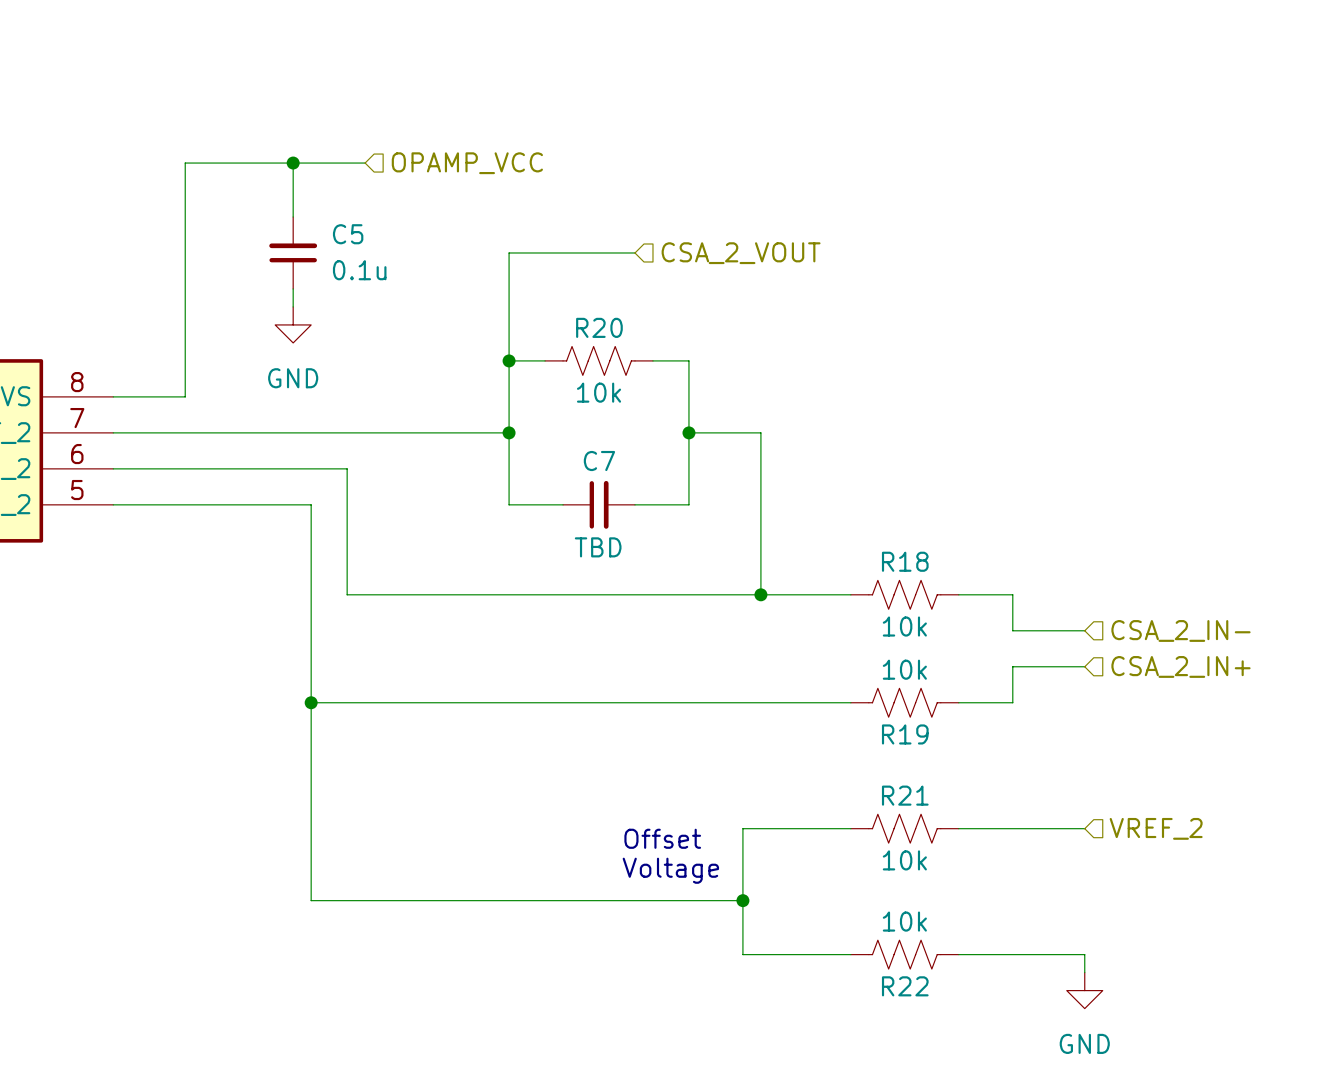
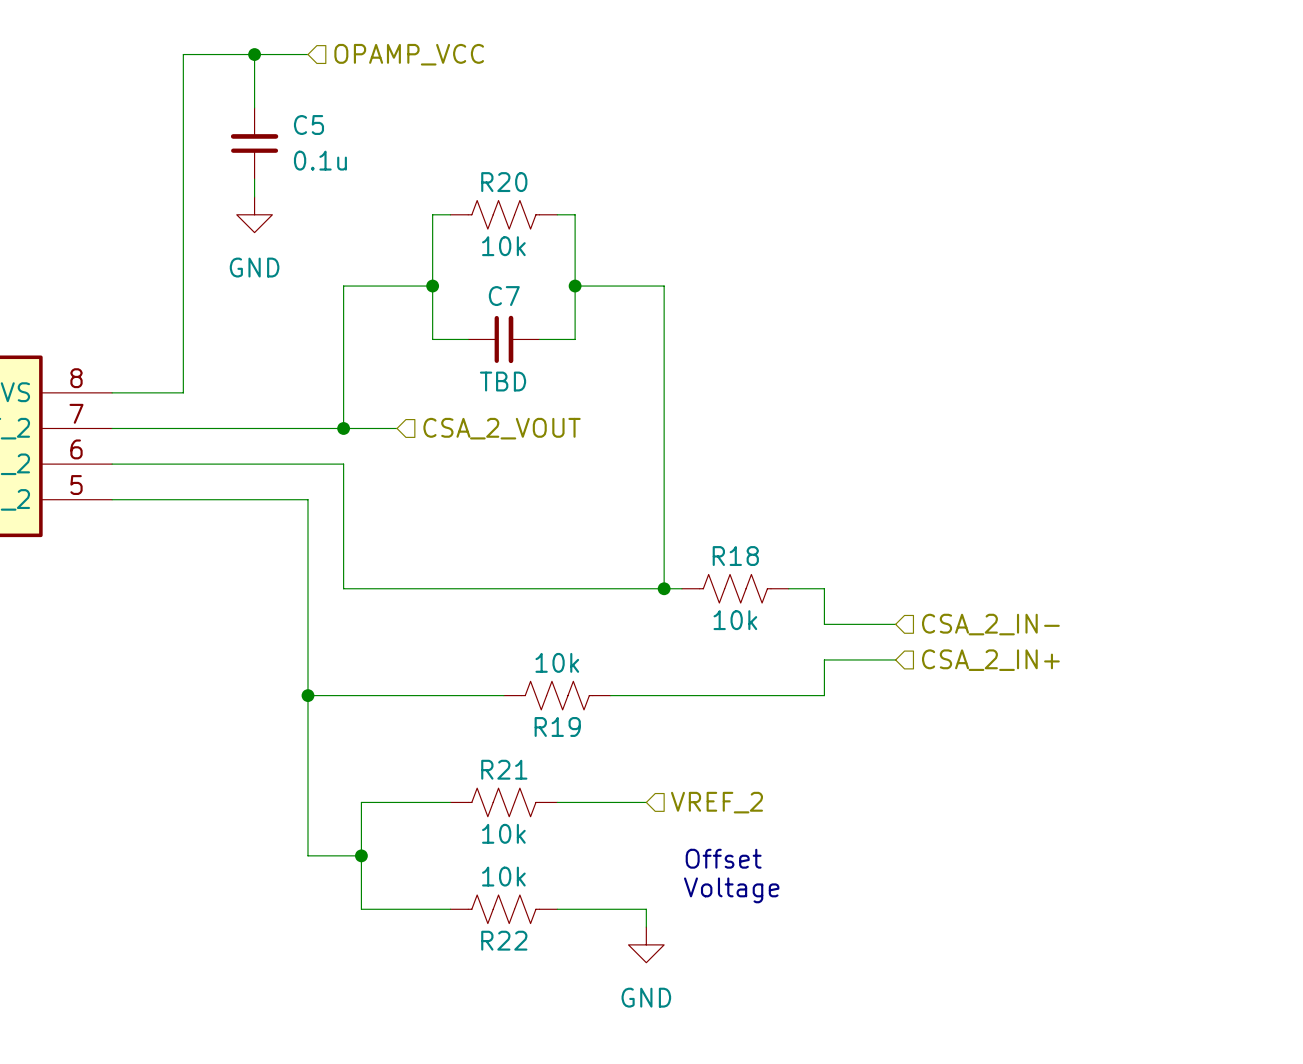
junction: none -> (254, 54)
wire: (185, 163) (365, 163) -> (183, 161) (183, 54) (307, 54)
wire: (293, 163) (293, 217) -> (254, 54) (254, 107)
junction: (293, 163) -> none
hierarchical label position: OPAMP_VCC (467, 163) -> OPAMP_VCC (409, 54)
wire: none -> (450, 214) (432, 214) (432, 339) (468, 339)
wire: none -> (557, 214) (575, 214) (575, 339) (539, 339)
C5 position: (293, 252) -> (254, 143)
wire: (634, 252) (509, 252) (509, 504) (563, 504) -> none
hierarchical label position: CSA_2_VOUT (741, 253) -> CSA_2_VOUT (502, 428)
wire: (293, 288) (293, 306) -> (254, 179) (254, 196)
wire: none -> (432, 286) (343, 286) (343, 428)
junction: none -> (432, 286)
wire: none -> (575, 286) (664, 286) (664, 588)
junction: none -> (575, 286)
power symbol position: GND (293, 324) -> GND (254, 214)
wire: (509, 360) (545, 360) -> none
junction: (509, 360) -> none
R20 position: (599, 360) -> (503, 214)
wire: (652, 360) (688, 360) (688, 504) (634, 504) -> none
junction: none -> (343, 428)
wire: (401, 432) (509, 432) -> none
junction: (509, 432) -> none
wire: (688, 432) (760, 432) (760, 594) -> none
junction: (688, 432) -> none
C7 position: (599, 504) -> (503, 339)
junction: none -> (664, 588)
wire: (688, 594) (796, 594) -> none
junction: (760, 594) -> none
wire: (832, 594) (850, 594) -> (824, 588) (824, 624) (895, 624)
R18 position: (904, 594) -> (735, 588)
wire: (958, 594) (1012, 594) (1012, 630) (1084, 630) -> none
hierarchical label position: CSA_2_IN- (1180, 630) -> CSA_2_IN- (990, 624)
wire: (1084, 666) (1012, 666) (1012, 702) (958, 702) -> none
hierarchical label position: CSA_2_IN+ (1180, 666) -> CSA_2_IN+ (990, 660)
wire: (509, 702) (617, 702) -> none
wire: (832, 702) (850, 702) -> (824, 695) (824, 659) (895, 659)
R19 position: (904, 702) -> (557, 695)
wire: none -> (450, 802) (361, 802) (361, 909) (450, 909)
wire: none -> (557, 802) (646, 802)
hierarchical label: none -> VREF_2 (716, 802)
wire: (850, 828) (742, 828) (742, 954) (850, 954) -> none
R21 position: (904, 828) -> (503, 802)
wire: (958, 828) (1084, 828) -> none
hierarchical label: VREF_2 (1156, 828) -> none
text position: Offset (662, 838) -> Offset (723, 858)
wire: (311, 864) (311, 900) (742, 900) -> (307, 855) (361, 855)
junction: none -> (361, 855)
text position: Voltage (670, 870) -> Voltage (731, 890)
junction: (742, 900) -> none
wire: none -> (557, 909) (646, 909) (646, 927)
power symbol: none -> GND (646, 944)
R22 position: (904, 954) -> (503, 909)
wire: (958, 954) (1084, 954) (1084, 972) -> none
power symbol: GND (1084, 990) -> none

